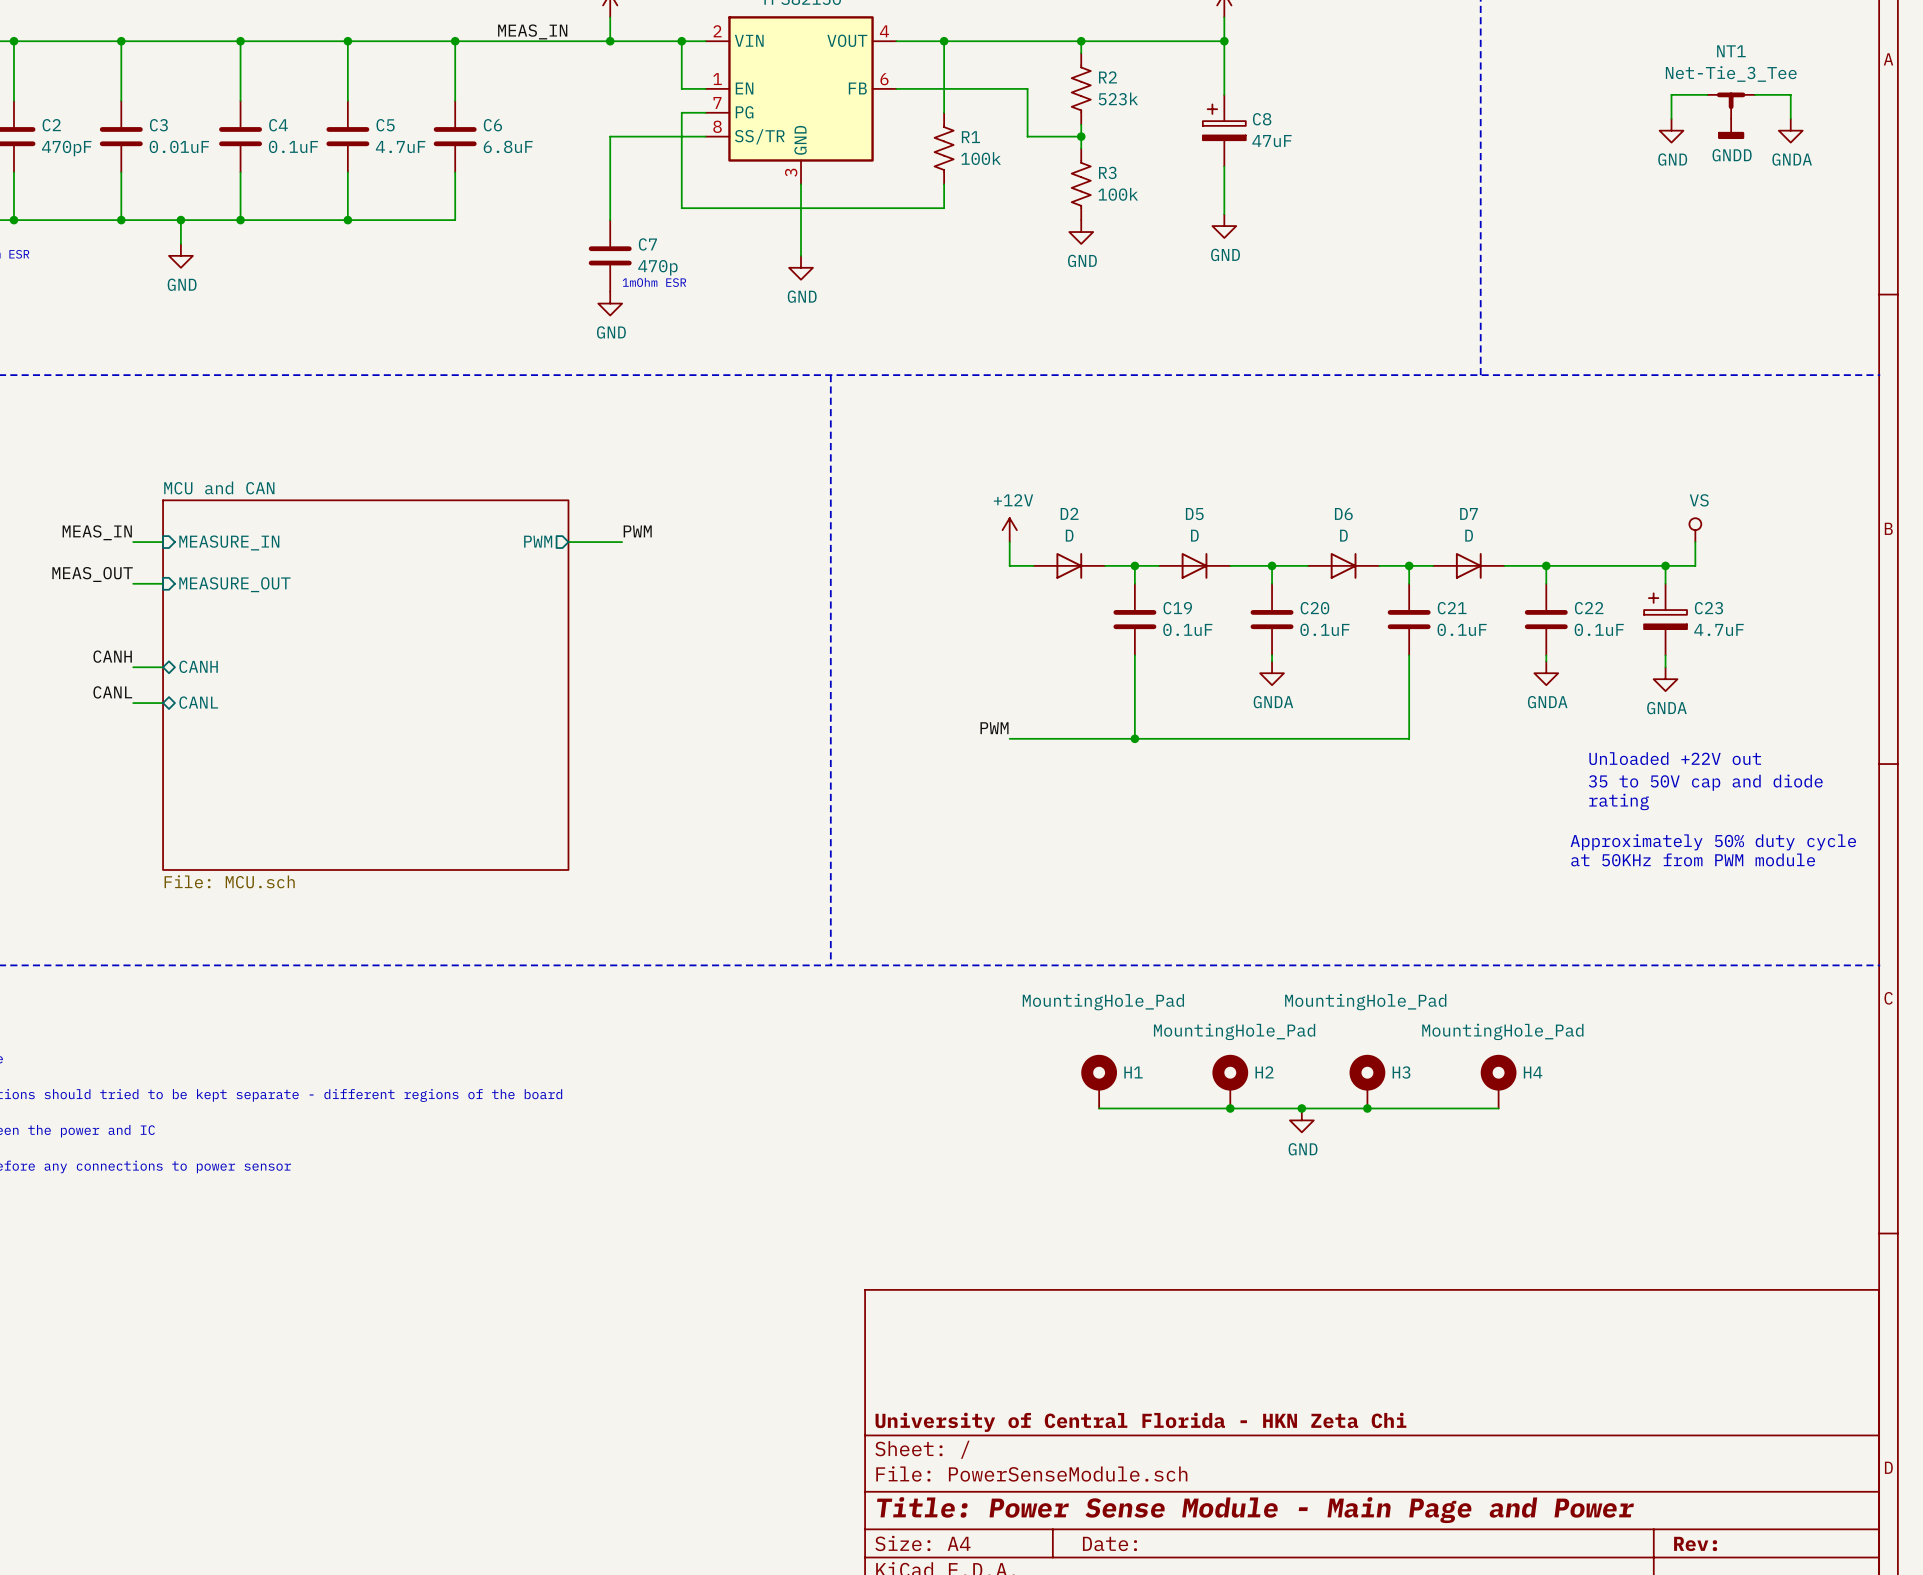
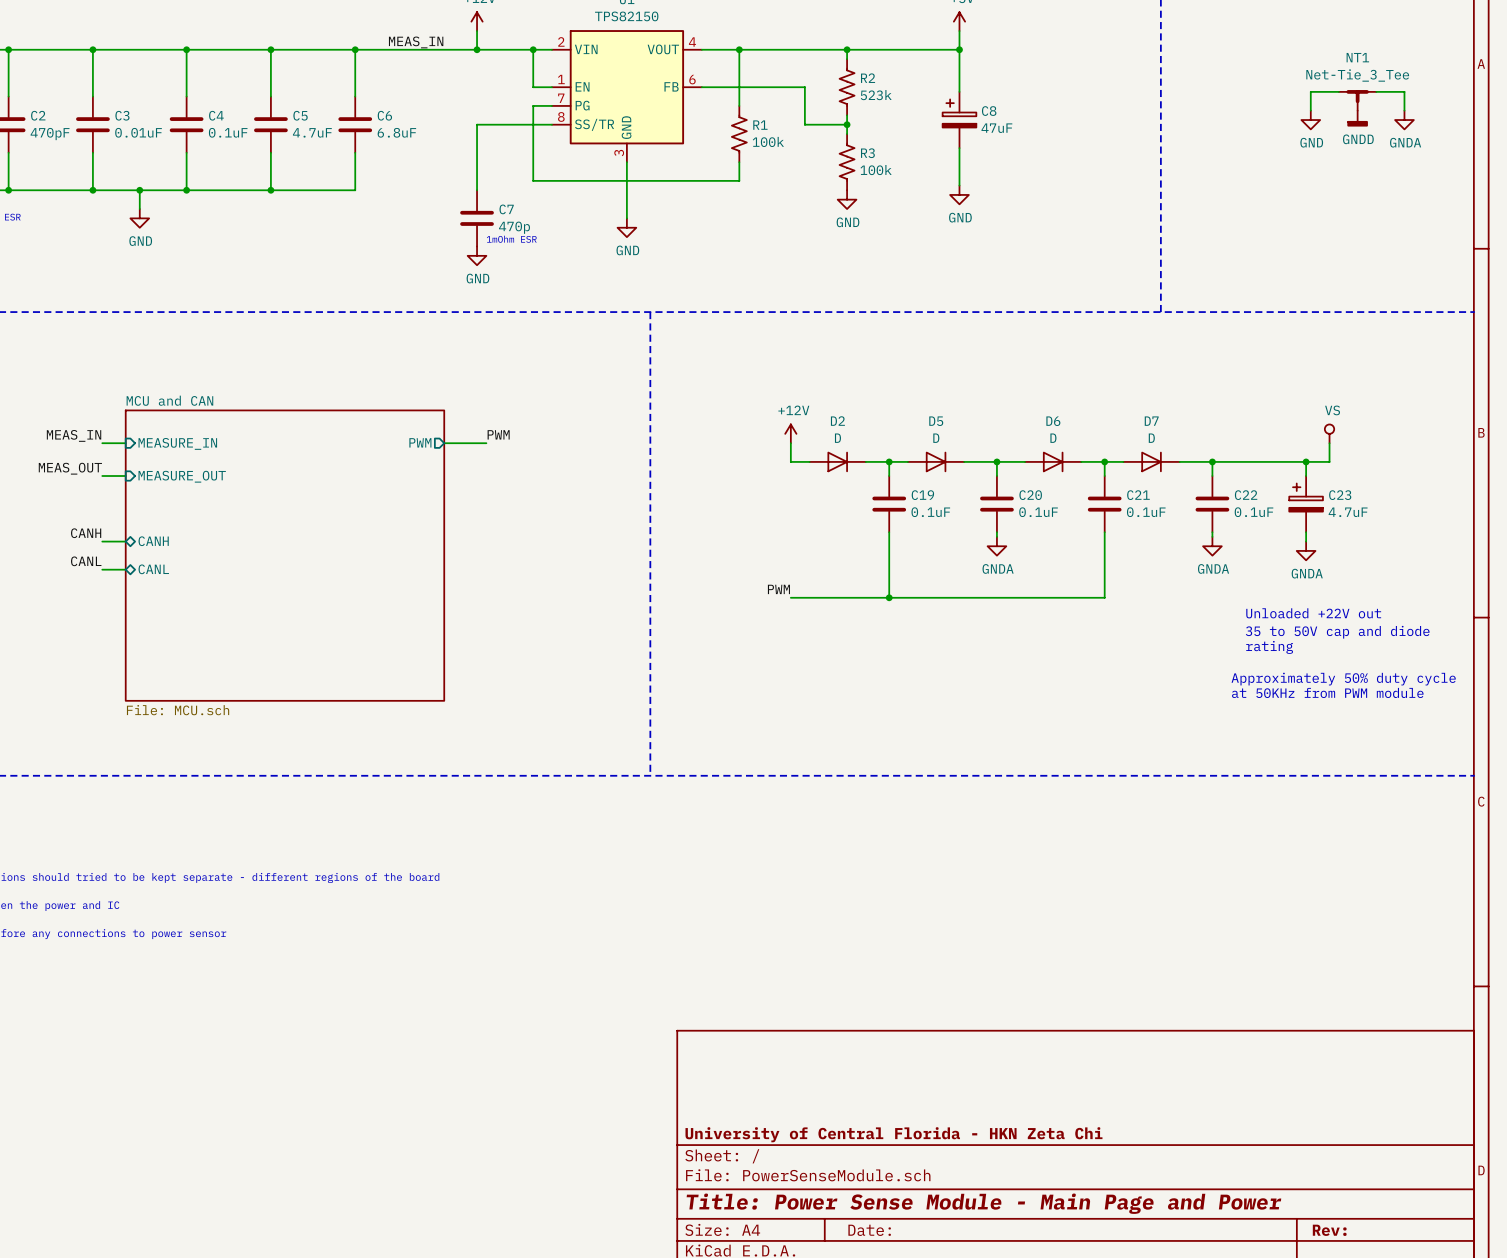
H1: MountingHole_Pad (1099, 1081) -> none
H2: MountingHole_Pad (1230, 1081) -> none
H3: MountingHole_Pad (1367, 1081) -> none
H4: MountingHole_Pad (1498, 1081) -> none
wire: (1099, 1108) (1498, 1108) -> none
junction: (1230, 1108) -> none
junction: (1301, 1108) -> none
junction: (1367, 1108) -> none
power symbol: GND (1301, 1120) -> none

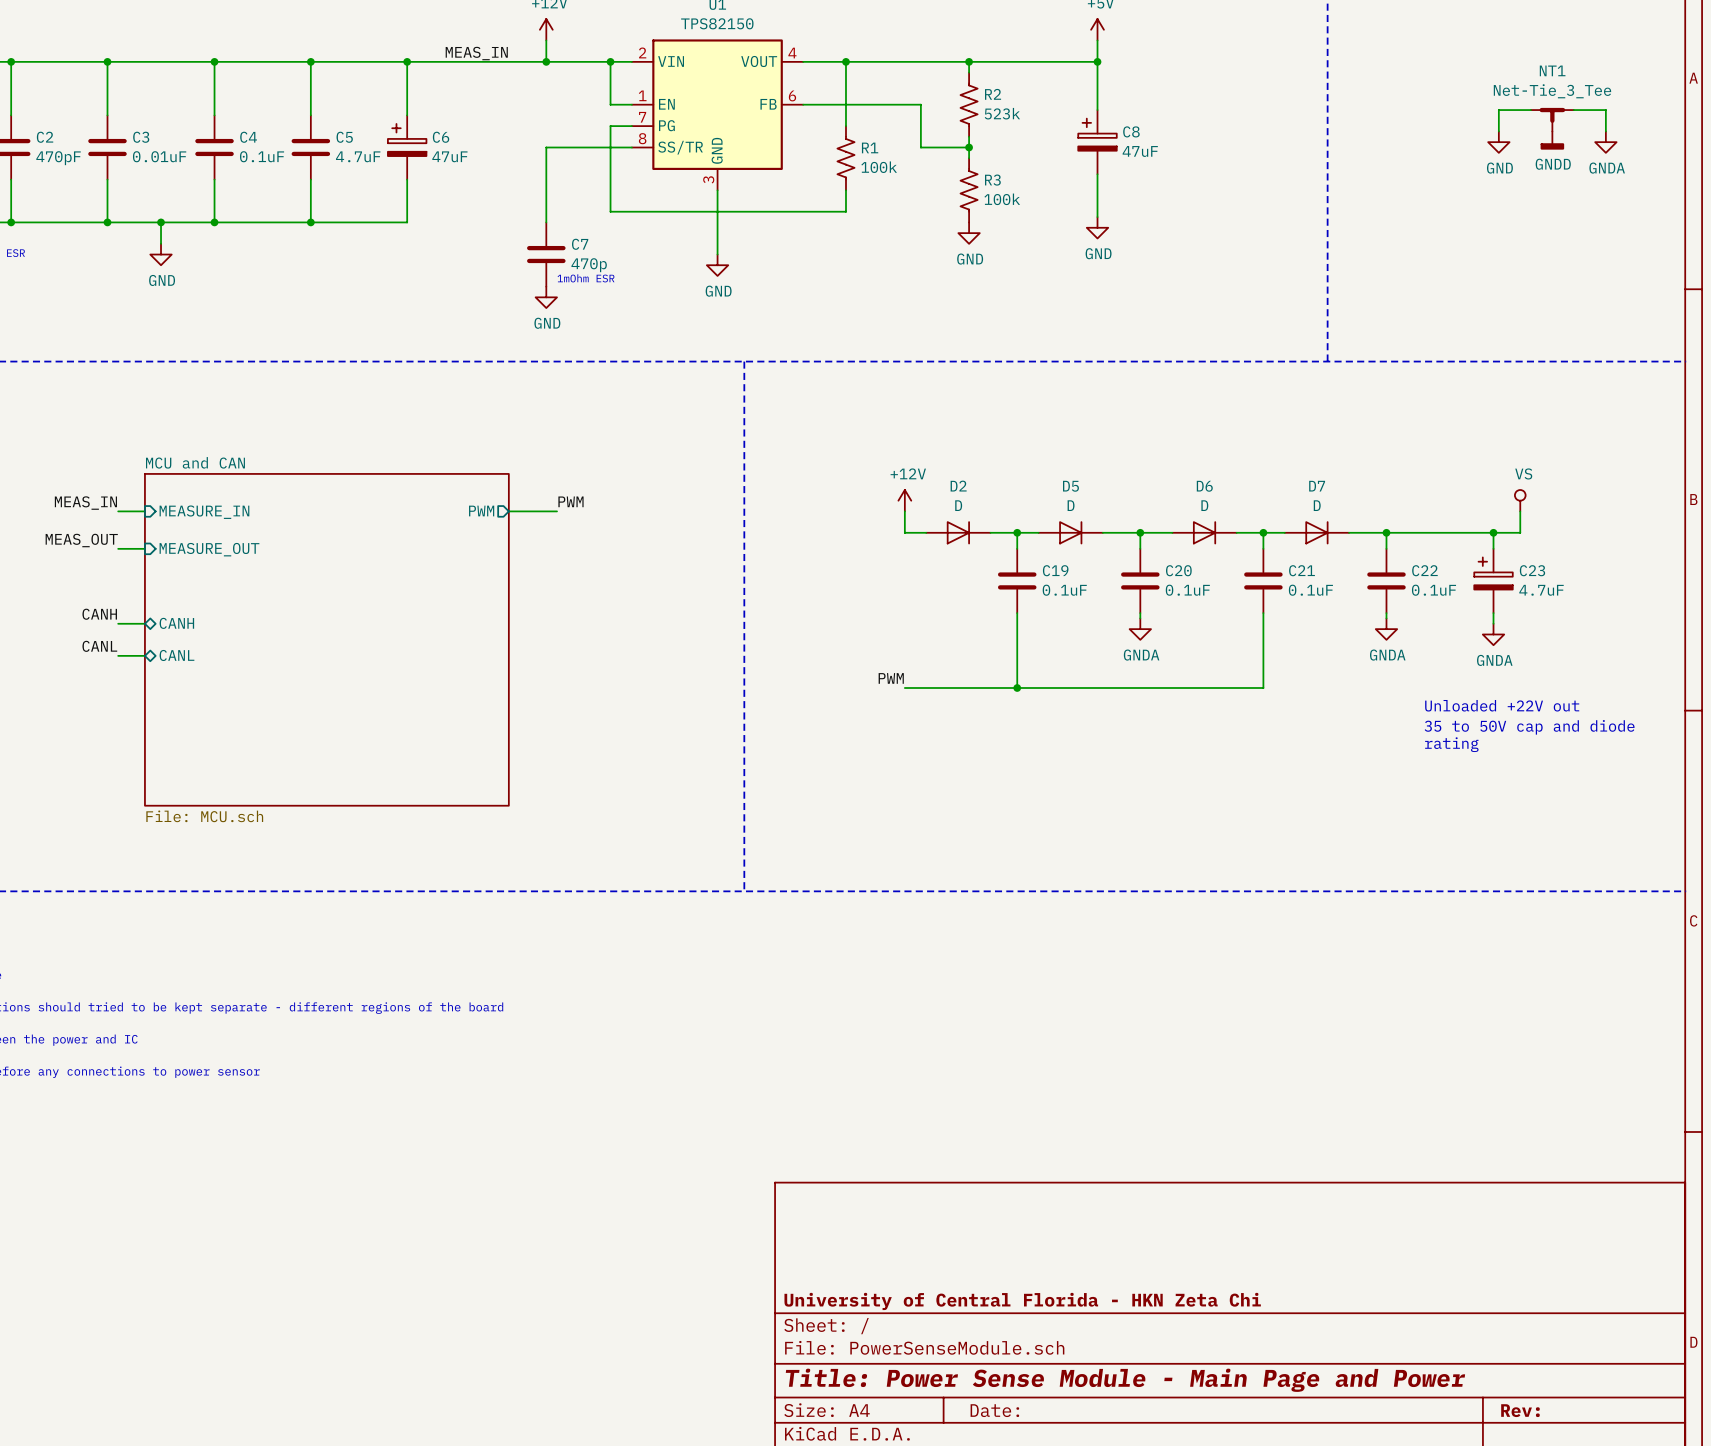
C6 symbol: [338, 96, 373, 153] -> [387, 115, 427, 180]
C6 value: 6.8uF (396, 132) -> 47uF (449, 156)
text: Approximately 50% duty cycle (1343, 679) -> none
text: at 50KHz from PWM module (1327, 692) -> none

